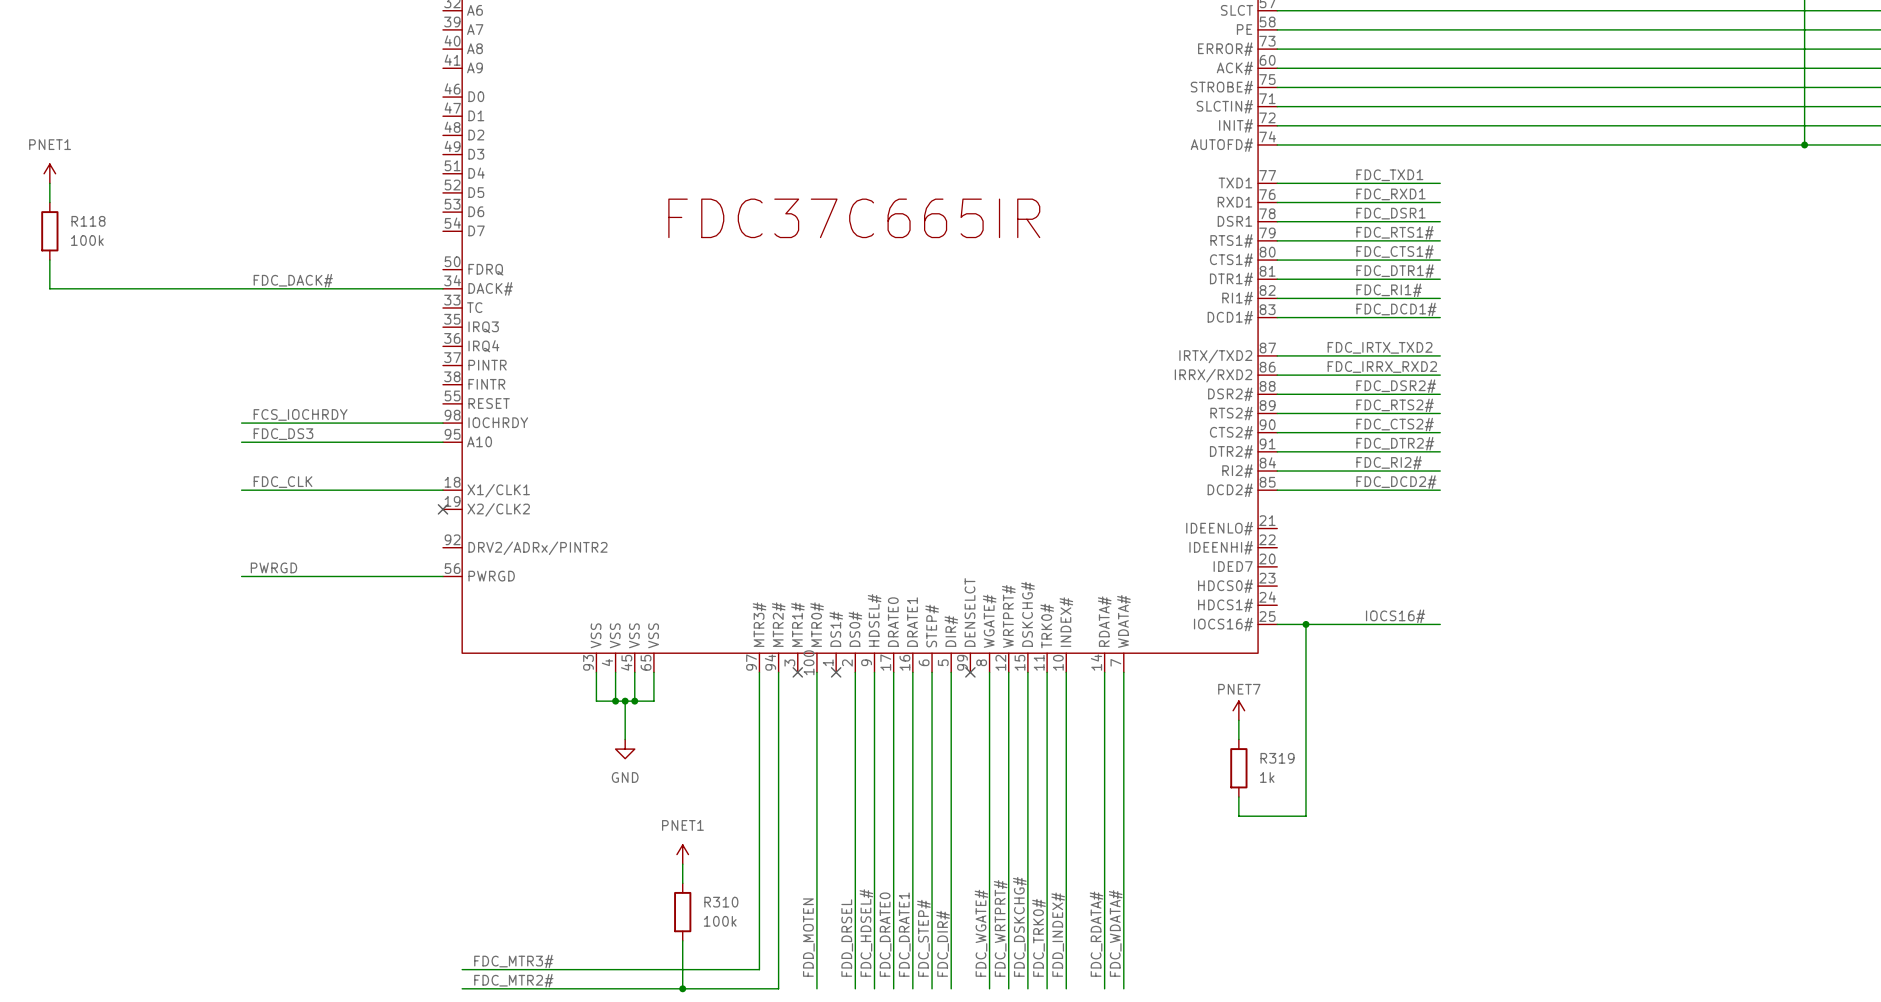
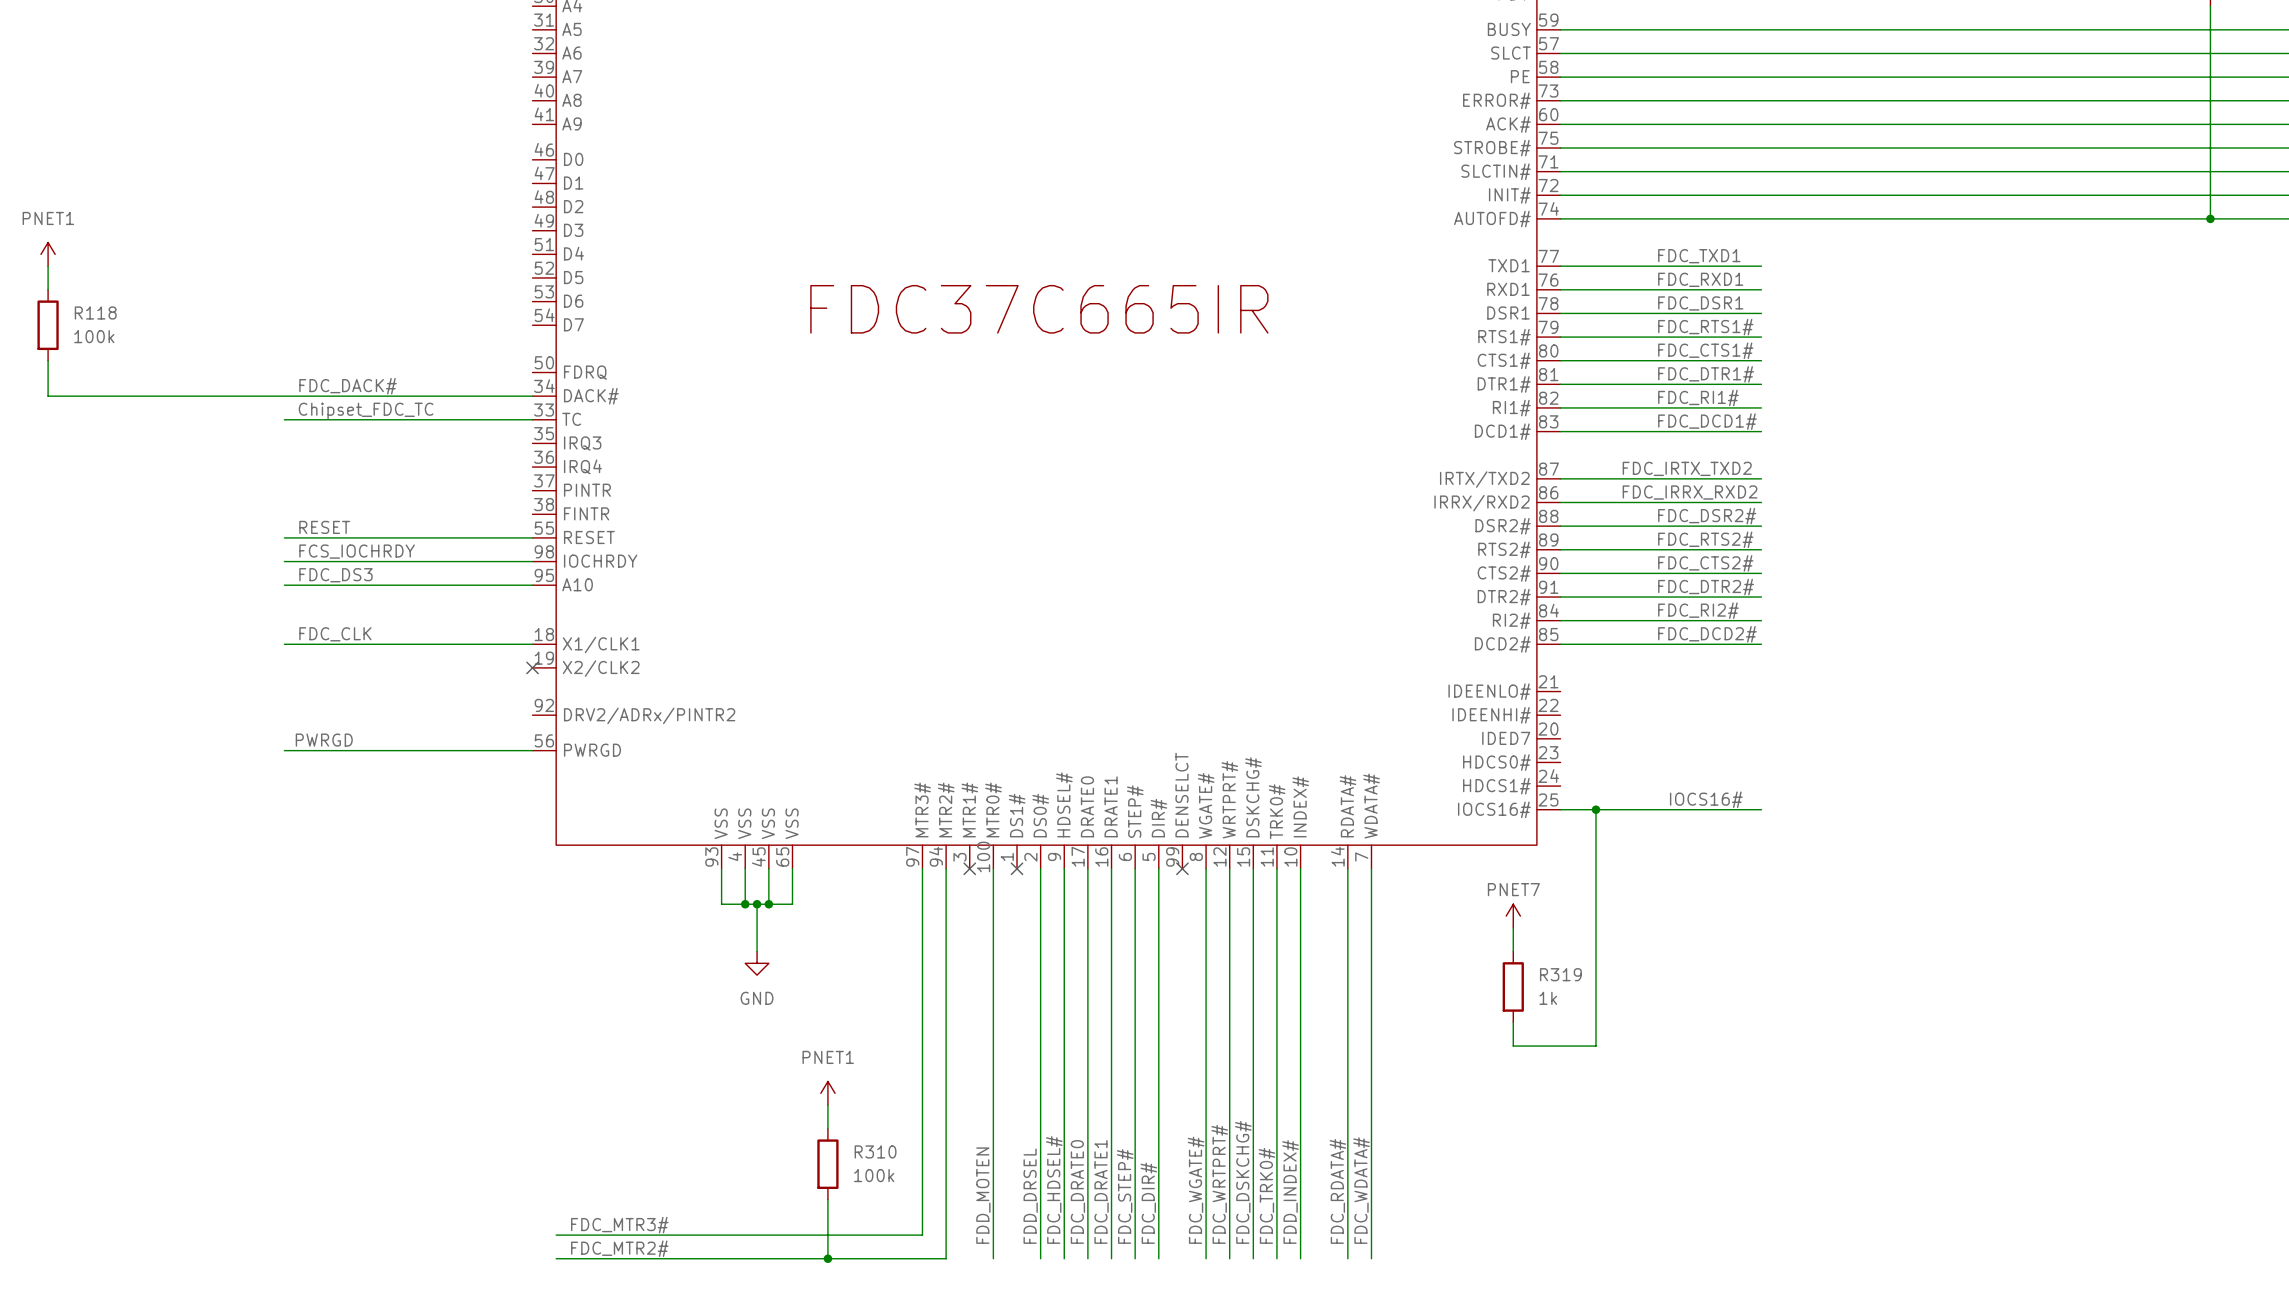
label: none -> Chipset_FDC_TC (366, 411)
wire: none -> (284, 419) (532, 419)
label: none -> RESET (324, 527)
wire: none -> (284, 537) (532, 537)

